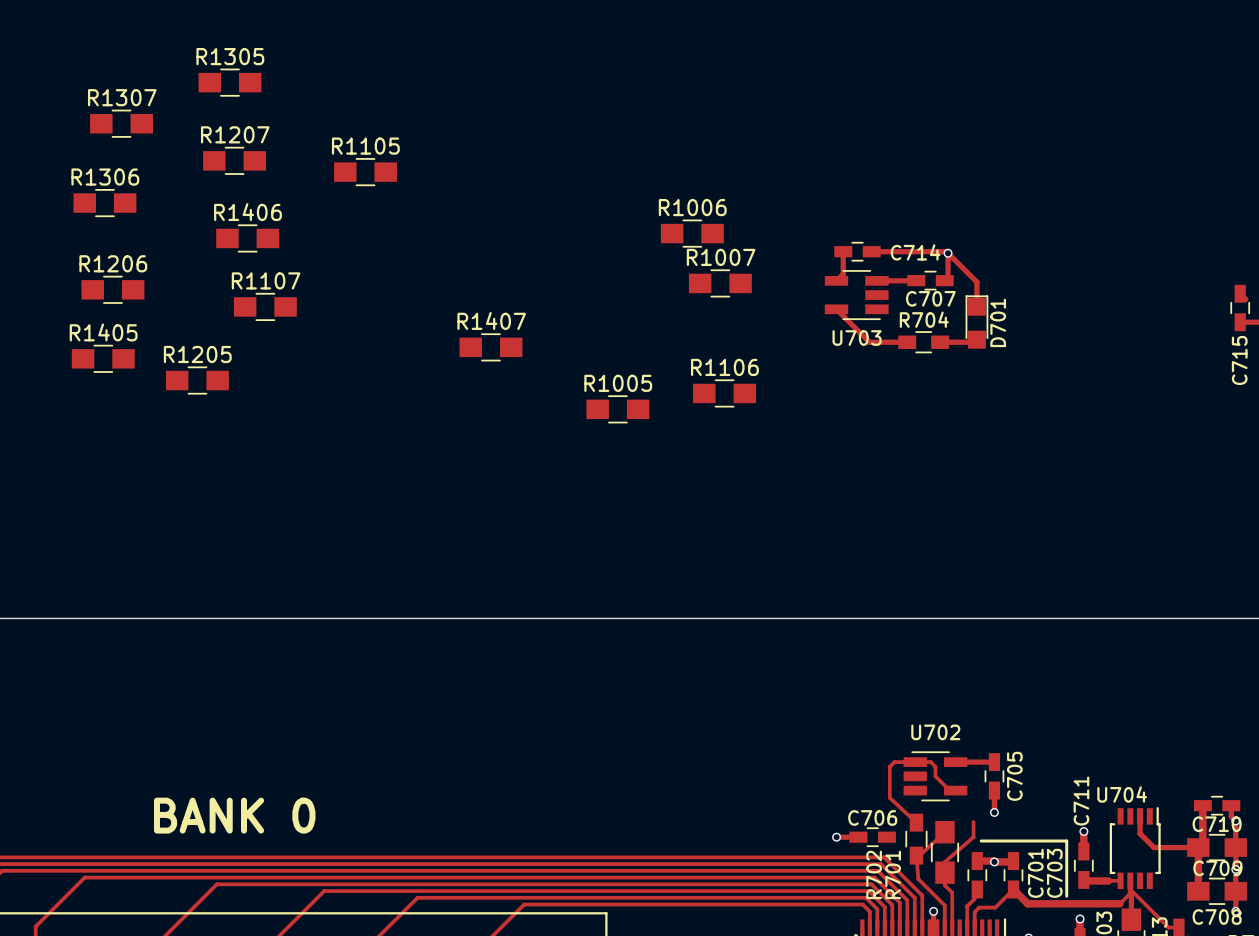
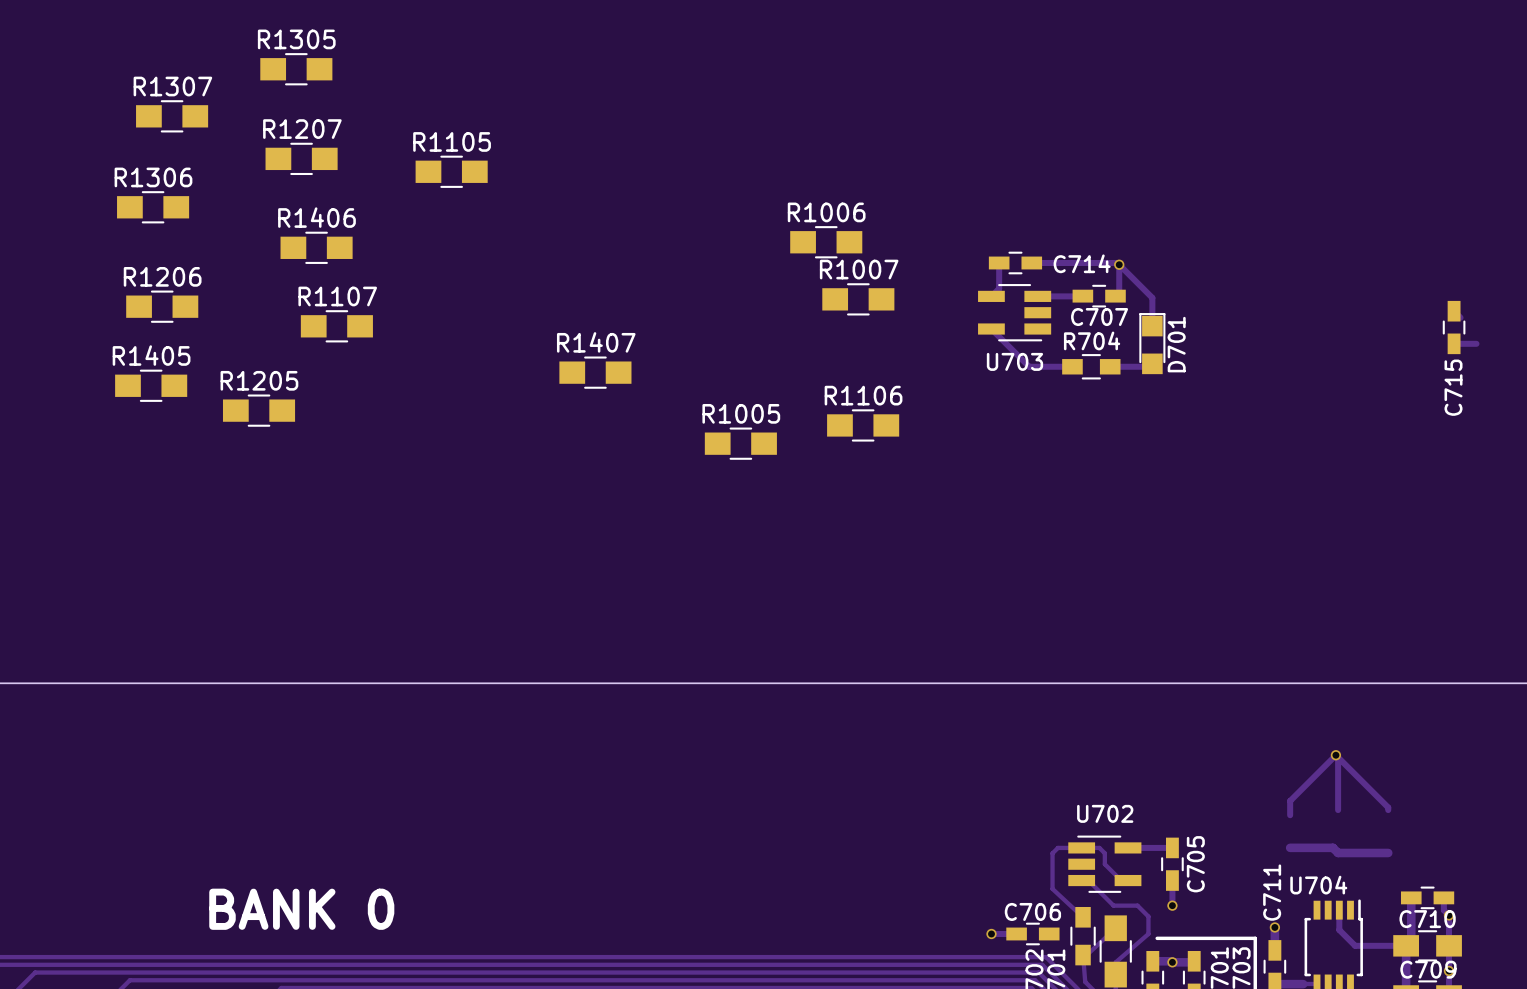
via: none -> (1335, 755)
track: none -> (1338, 757) (1338, 810)
track: none -> (1388, 810) (1388, 807) (1335, 755) (1290, 801) (1290, 815)
track: none -> (1290, 847) (1332, 847) (1338, 852) (1388, 852)
track: none -> (1088, 880) (1113, 905) (1137, 905) (1148, 916)

